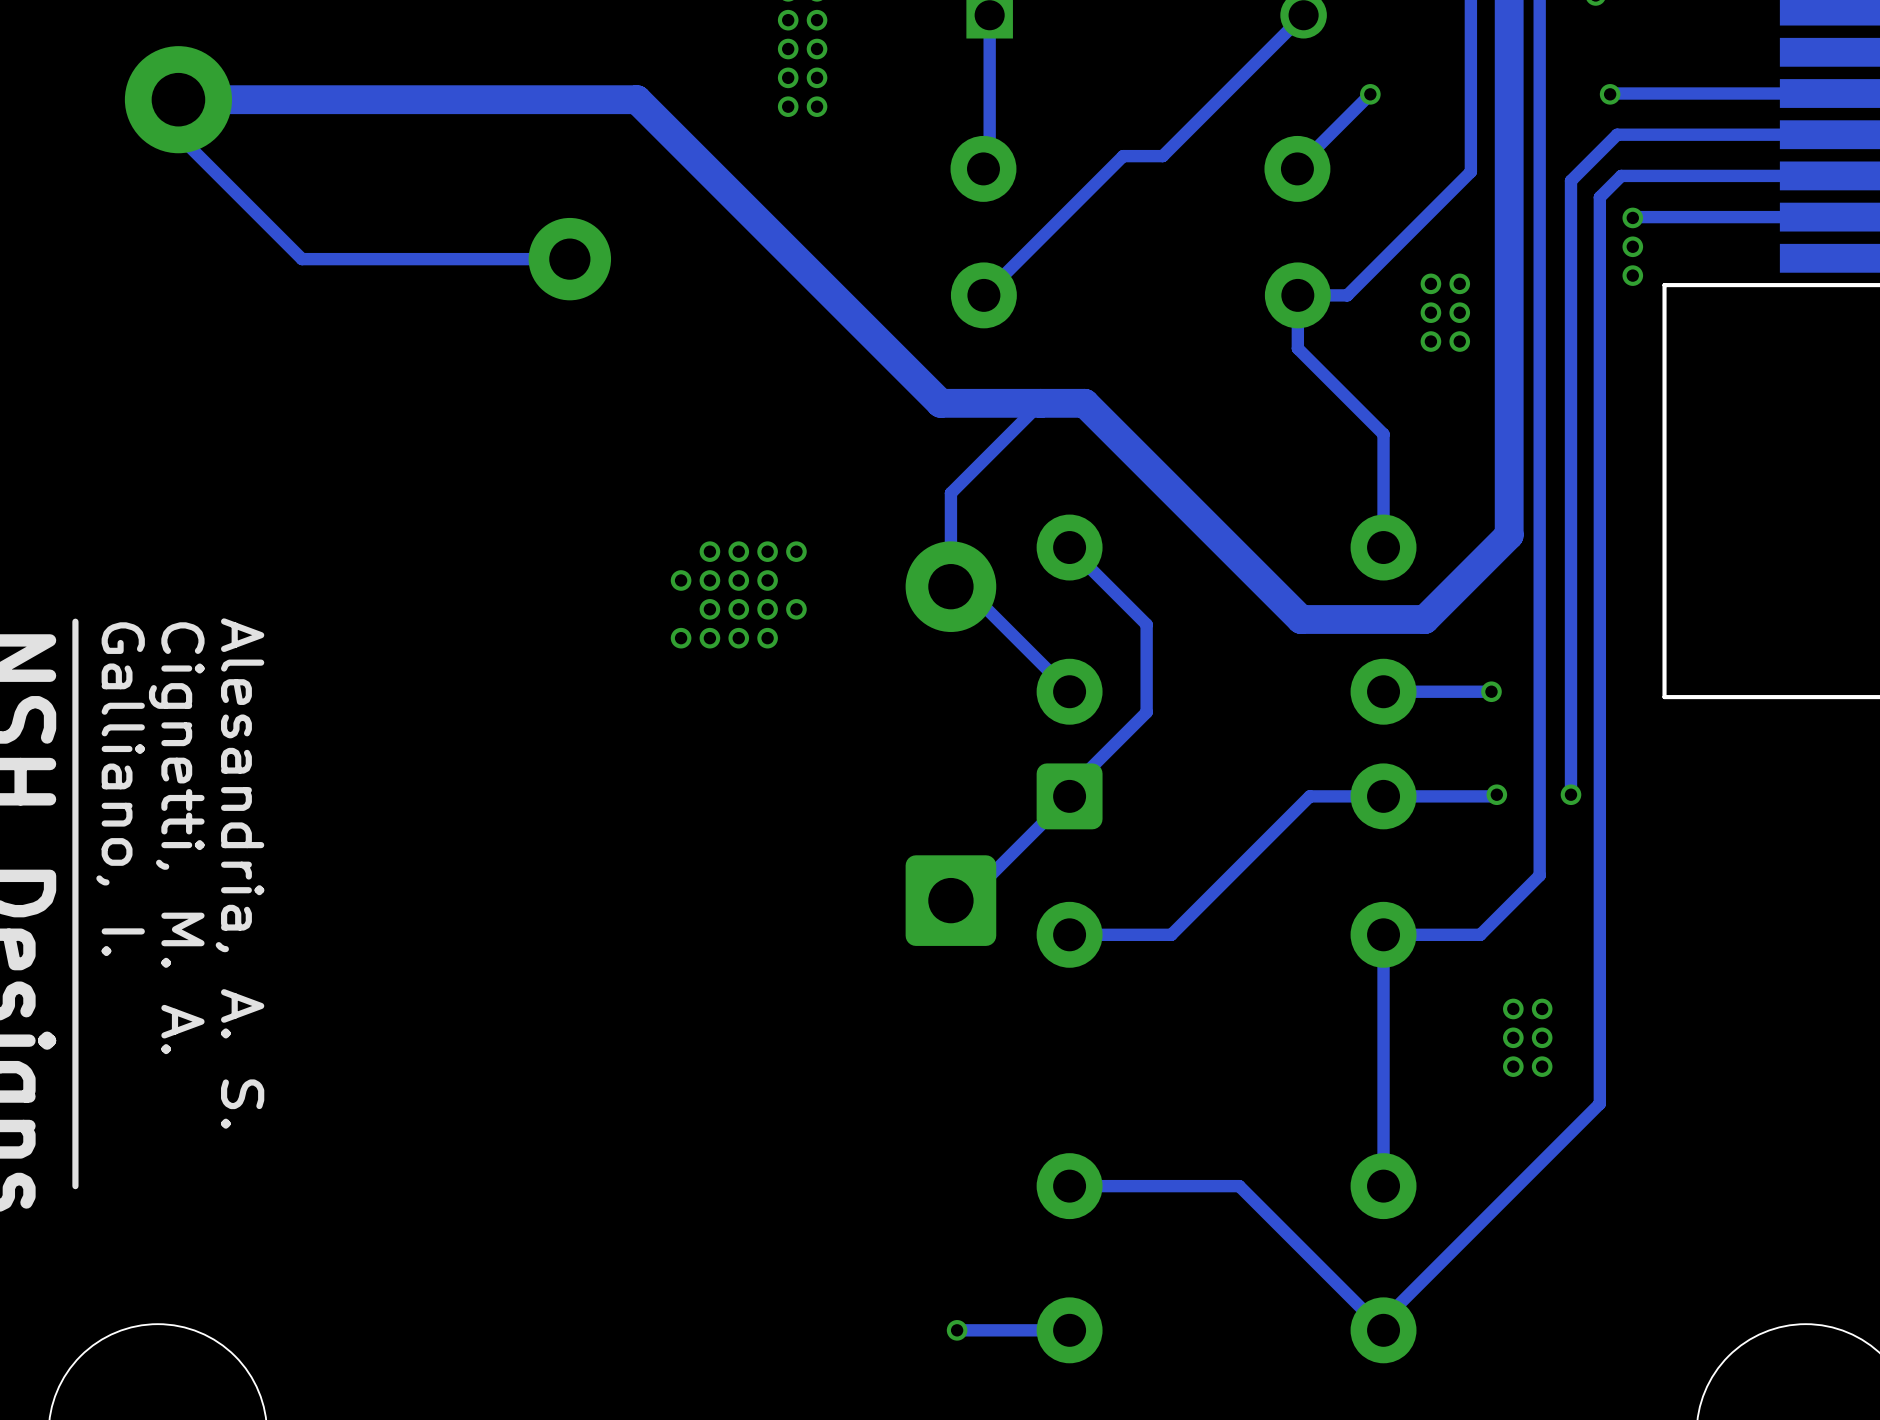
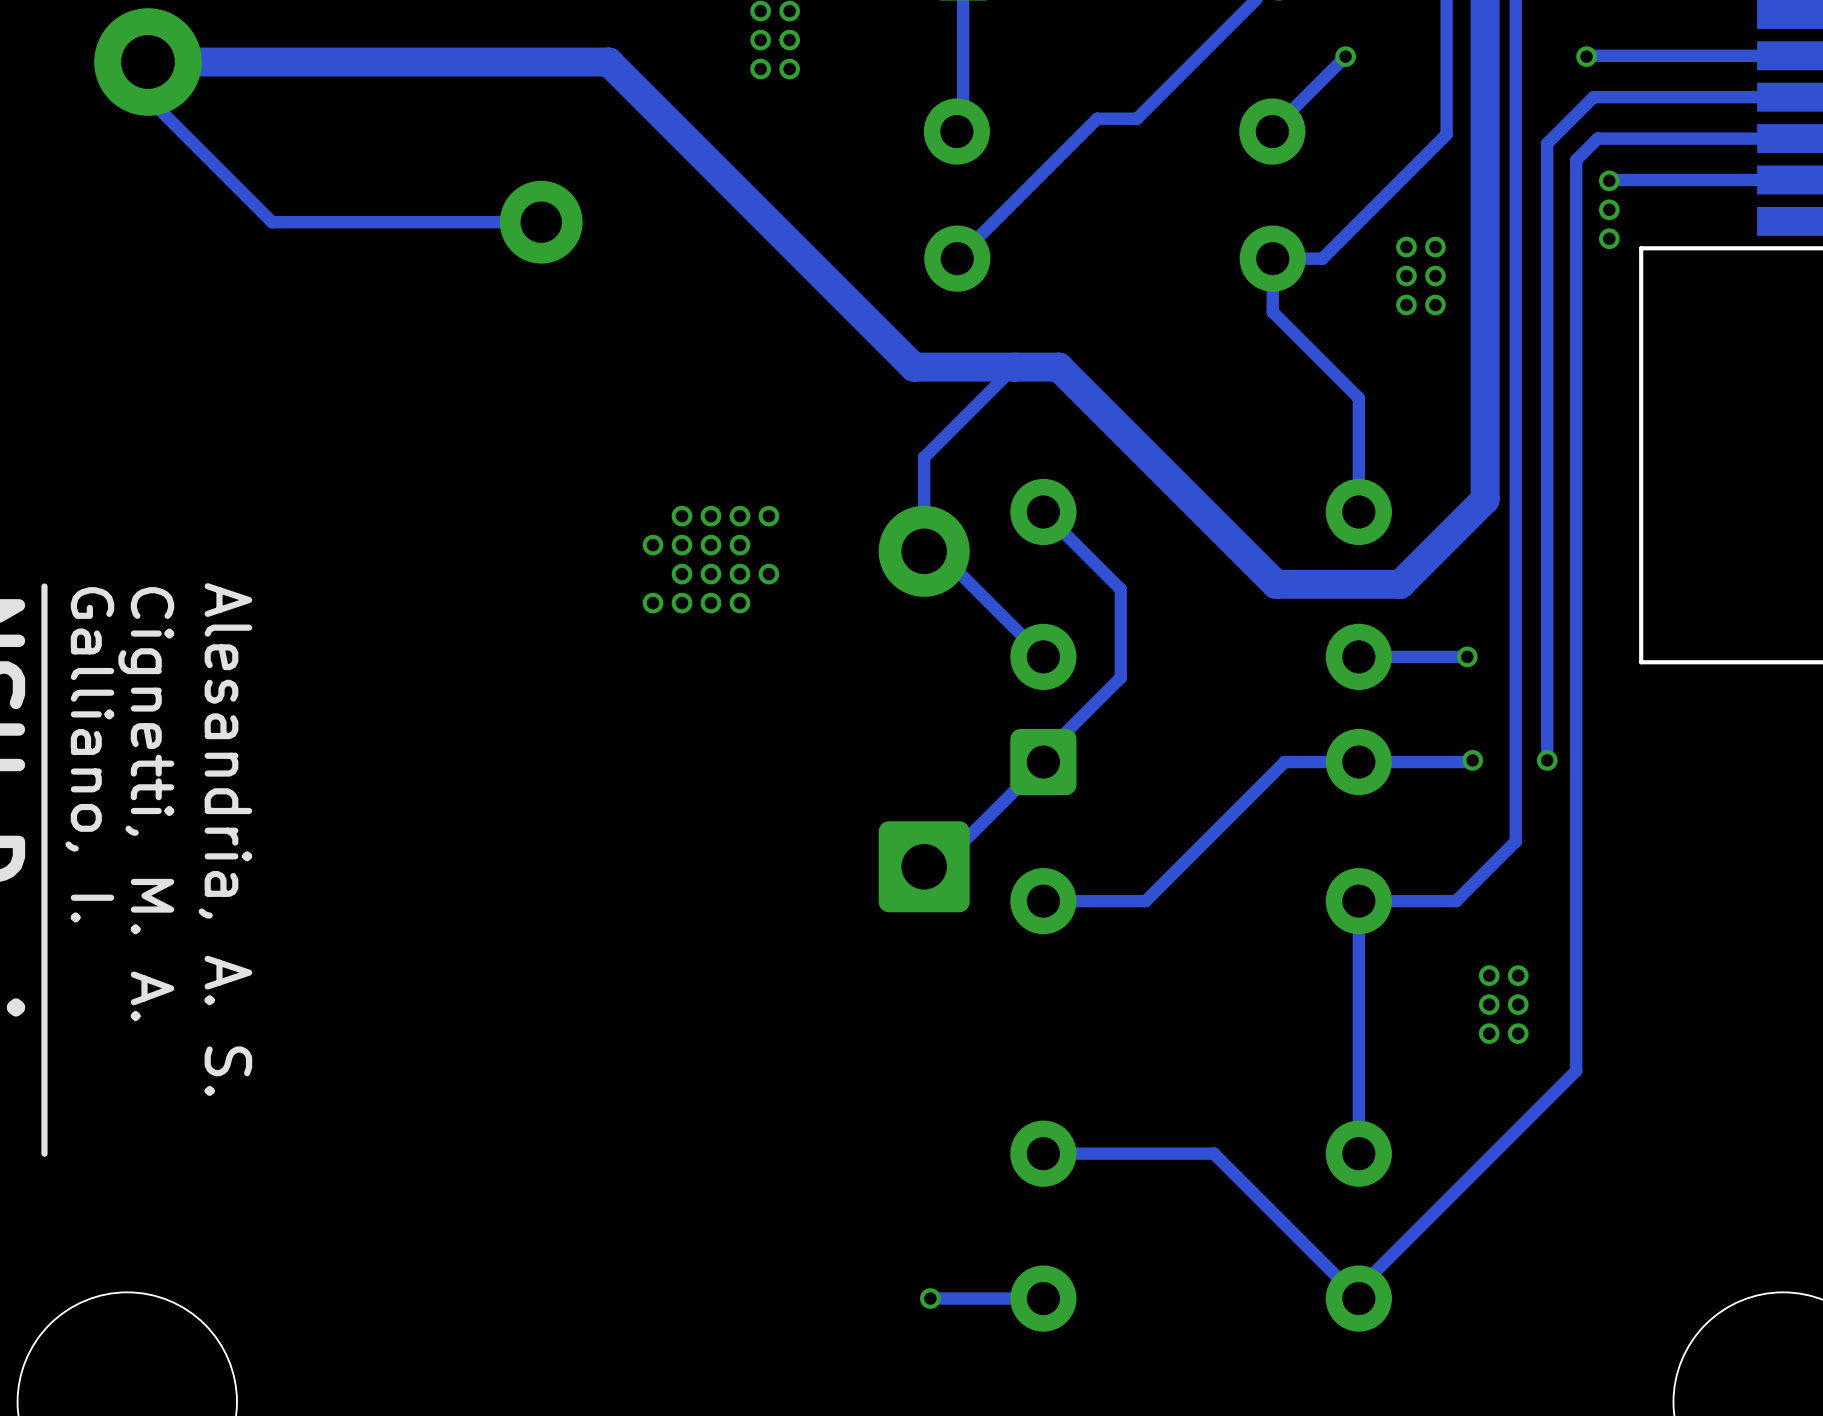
text position: Alesandria, A. S. (239, 873) -> Alesandria, A. S. (225, 839)

